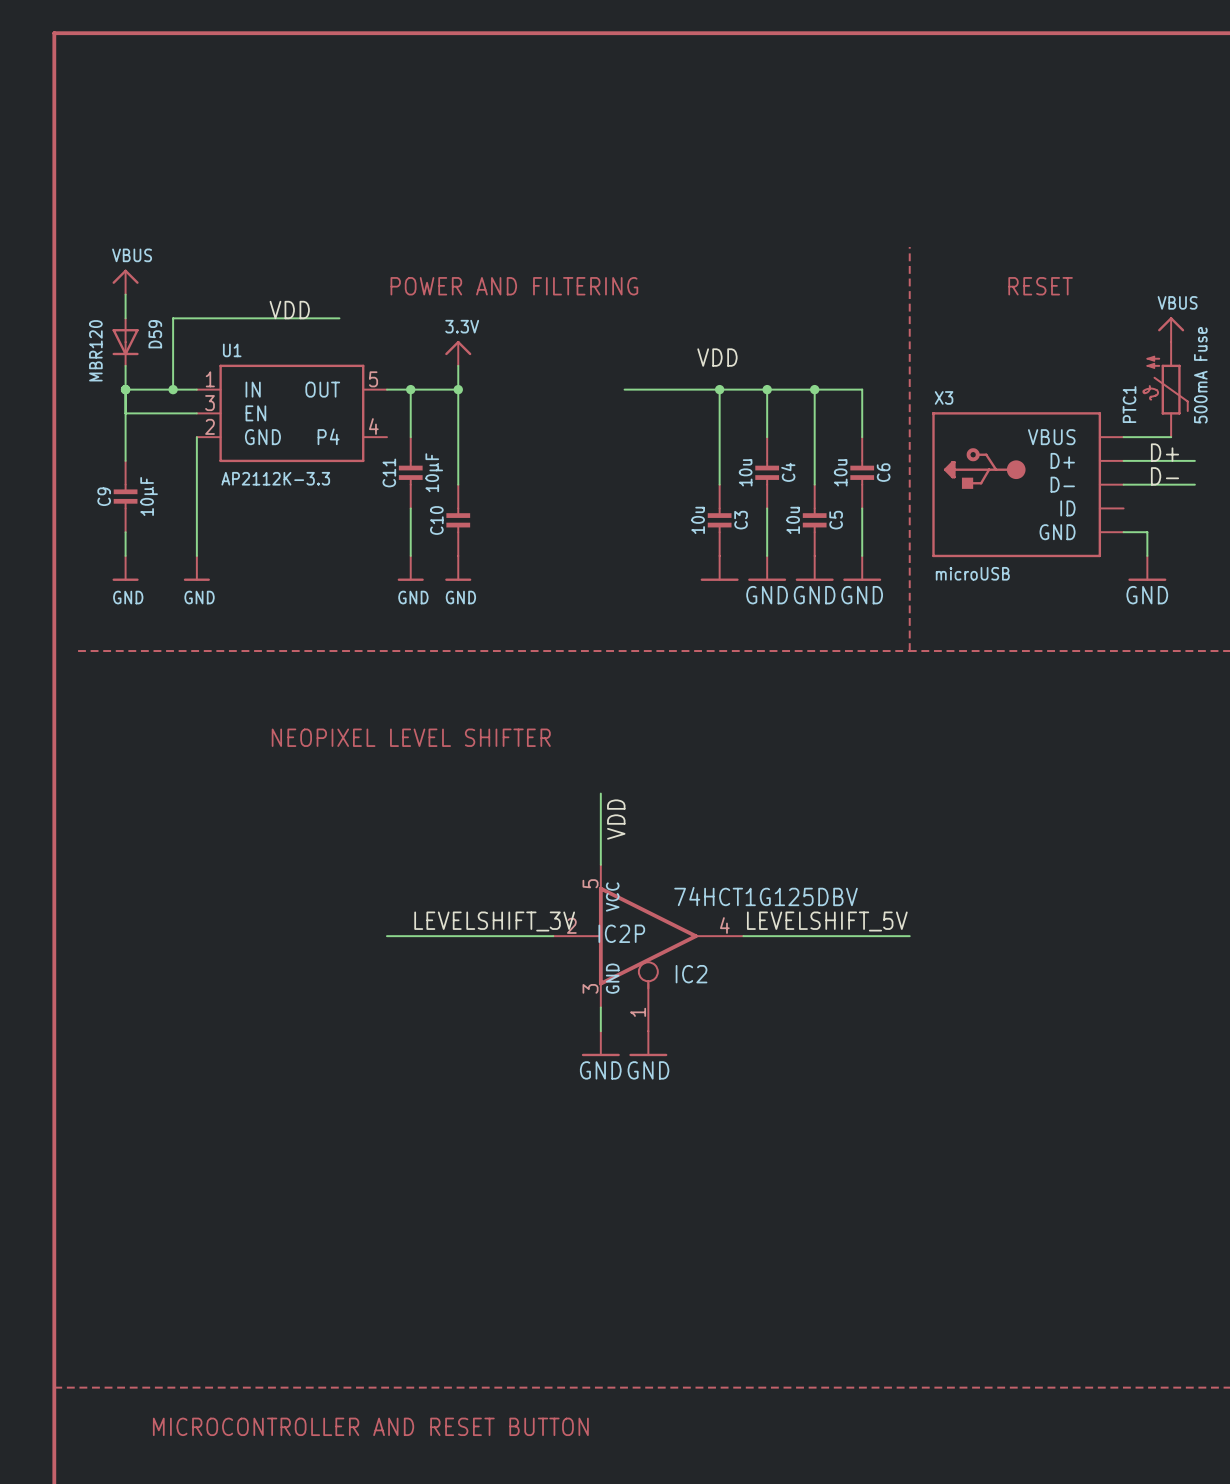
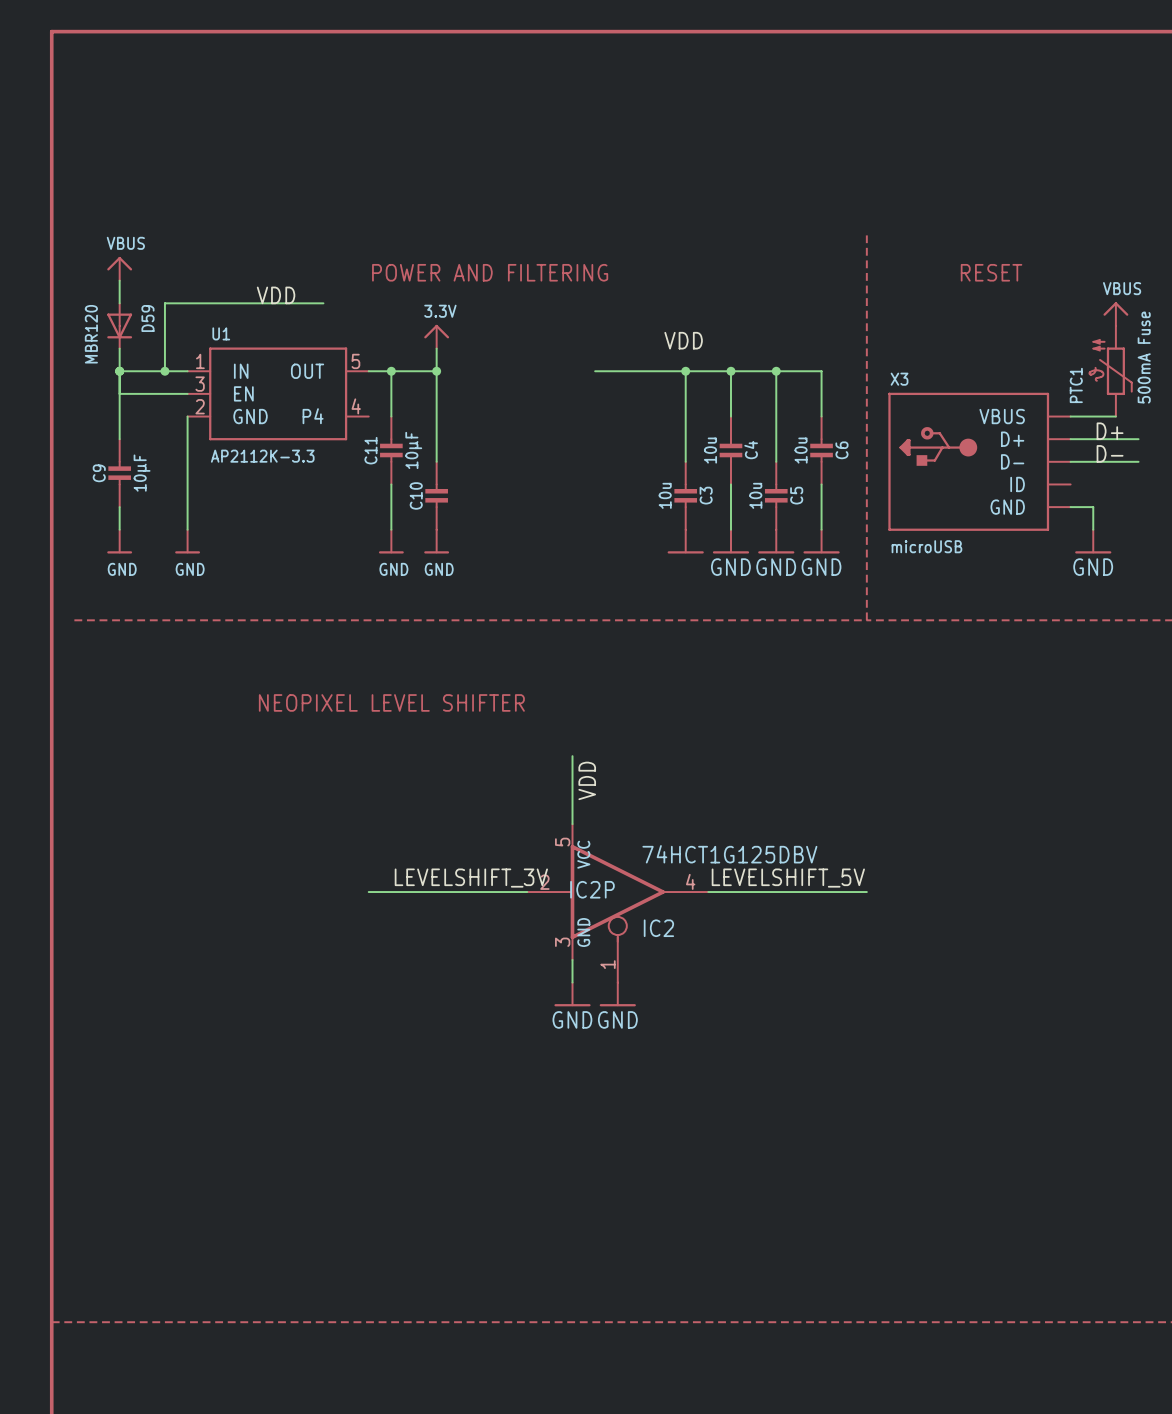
text: MICROCONTROLLER AND RESET BUTTON (370, 1426) -> none

